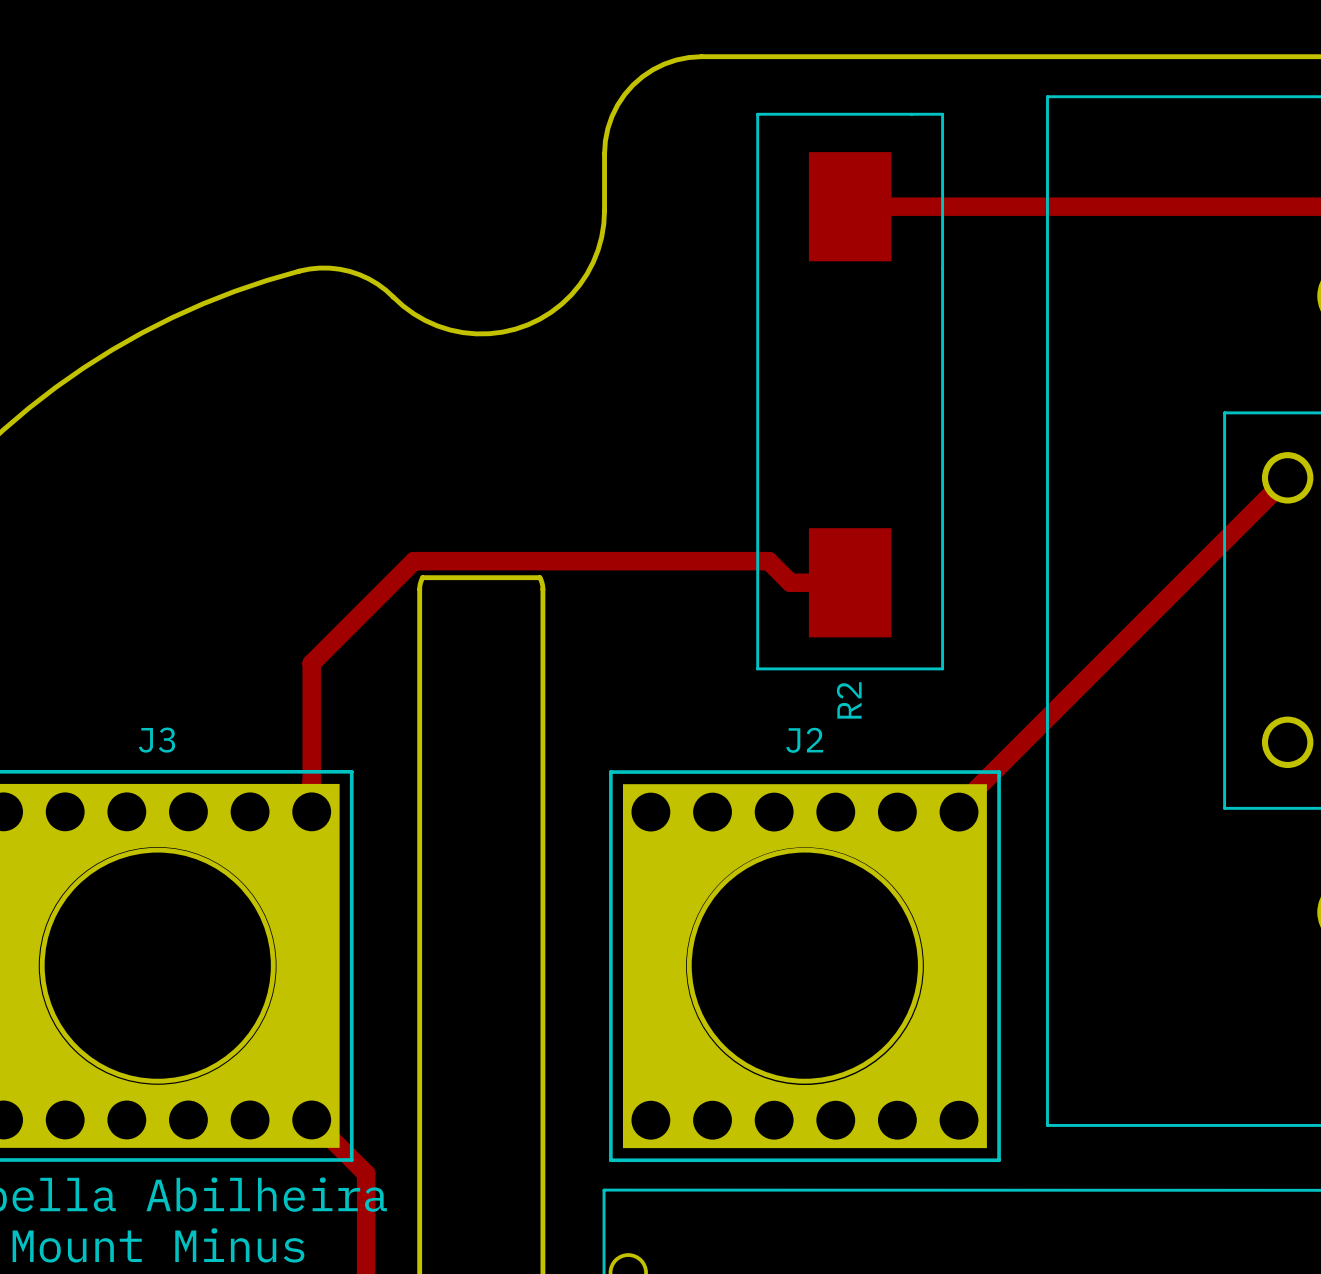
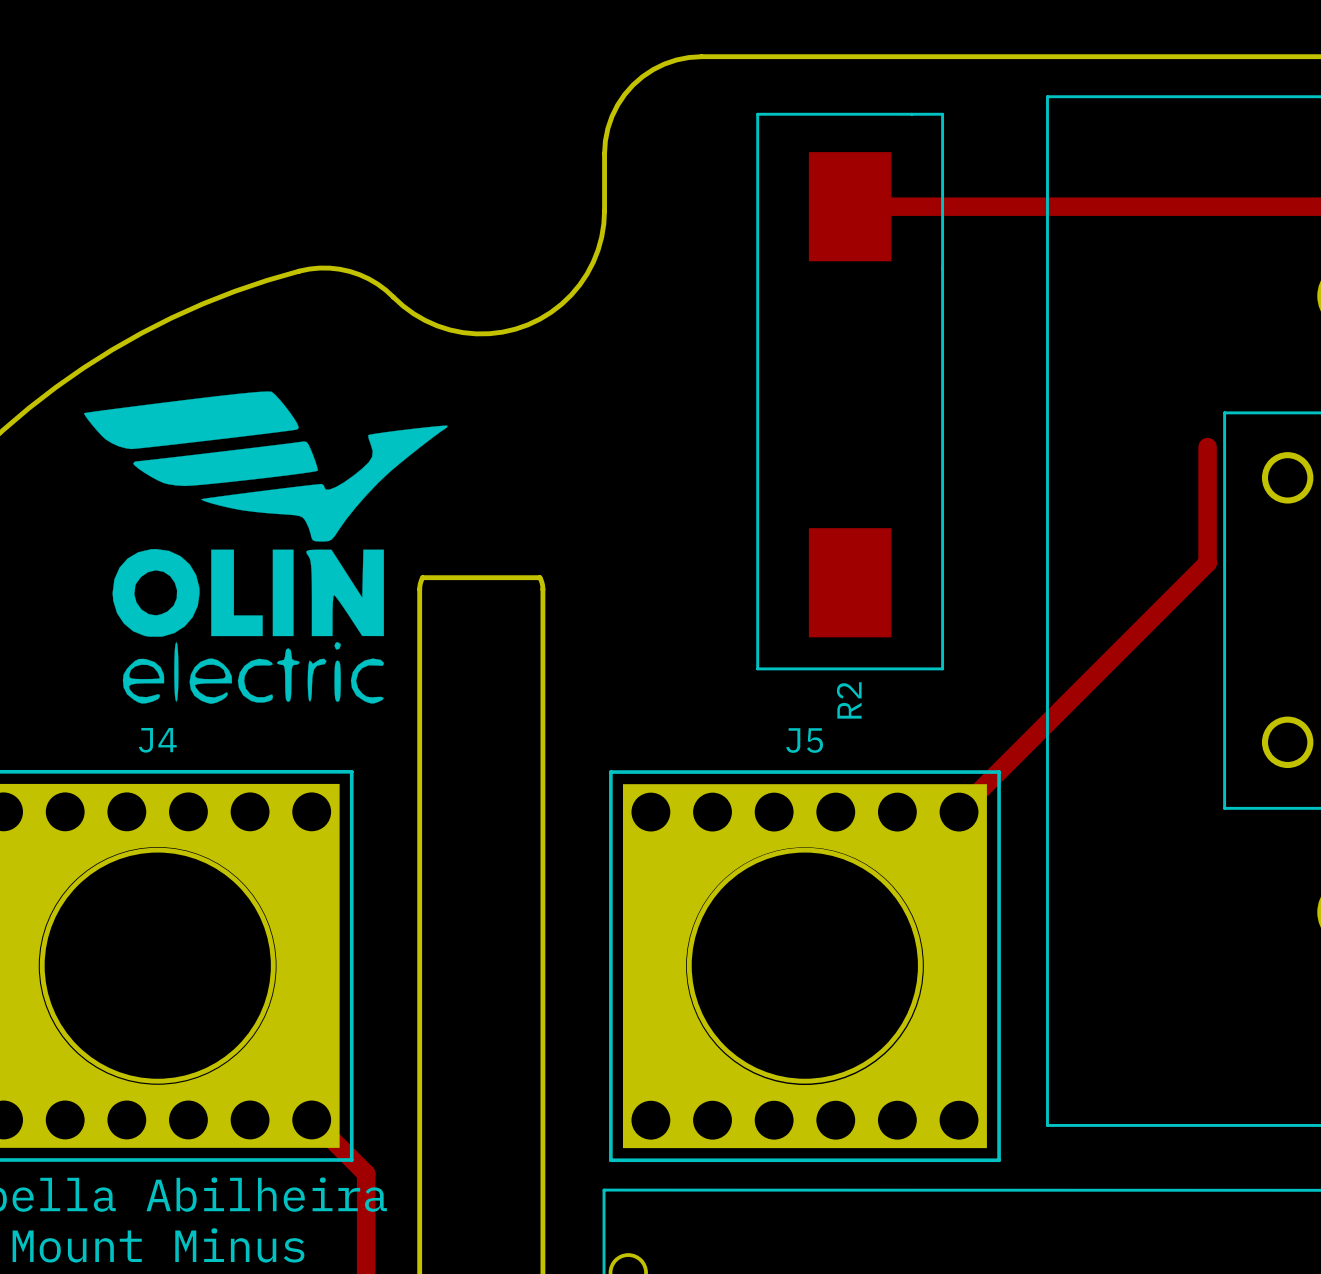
drawing: none -> [84, 391, 448, 704]
track: (1287, 477) (959, 806) (959, 812) -> (1207, 447) (1207, 563) (959, 811)
track: (850, 582) (790, 582) (768, 561) (413, 561) (311, 663) (311, 811) -> none
J3 name: J3 (157, 740) -> J4 (157, 740)
J2 name: J2 (804, 740) -> J5 (804, 740)

